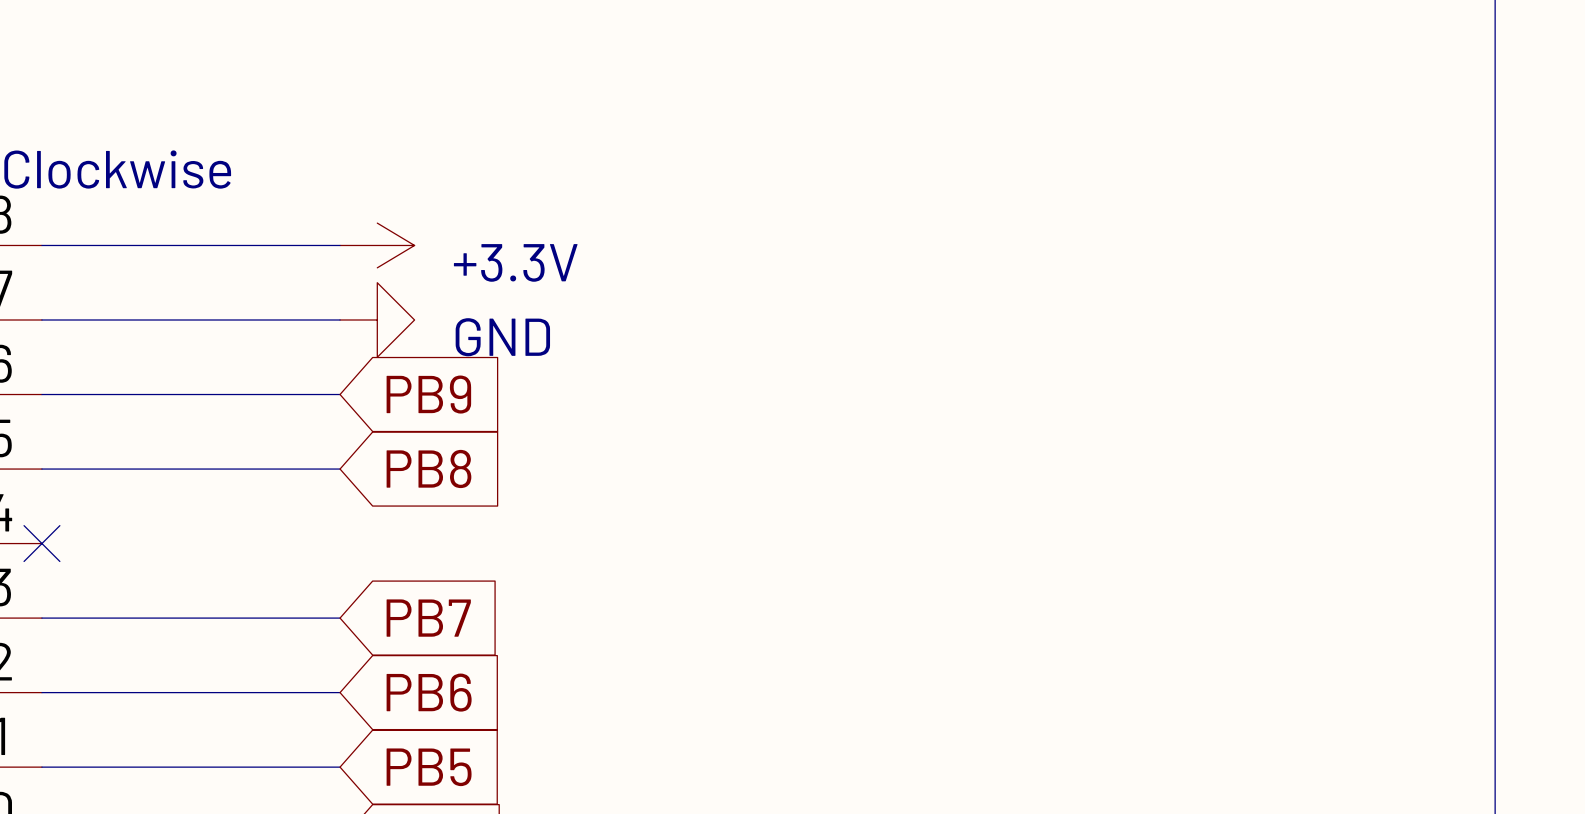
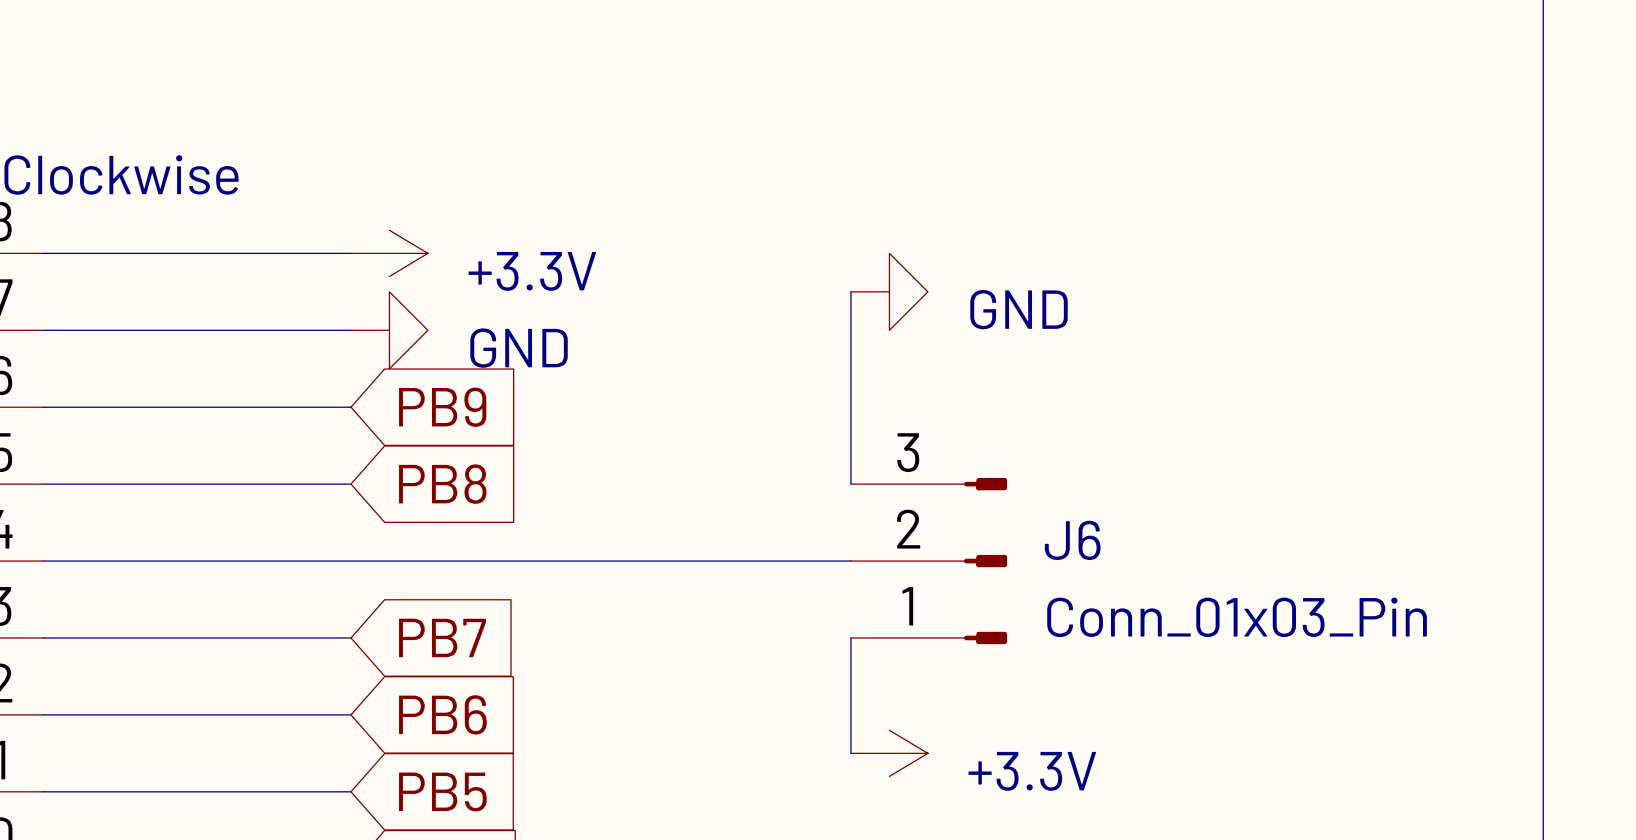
wire: none -> (850, 291) (850, 484)
power symbol: none -> GND (889, 291)
wire: none -> (43, 561) (850, 561)
no-connect mark: (41, 543) -> none
J6: none -> Conn_01x03_Pin (929, 561)
wire: none -> (850, 637) (850, 753)
power symbol: none -> +3.3V (889, 753)

